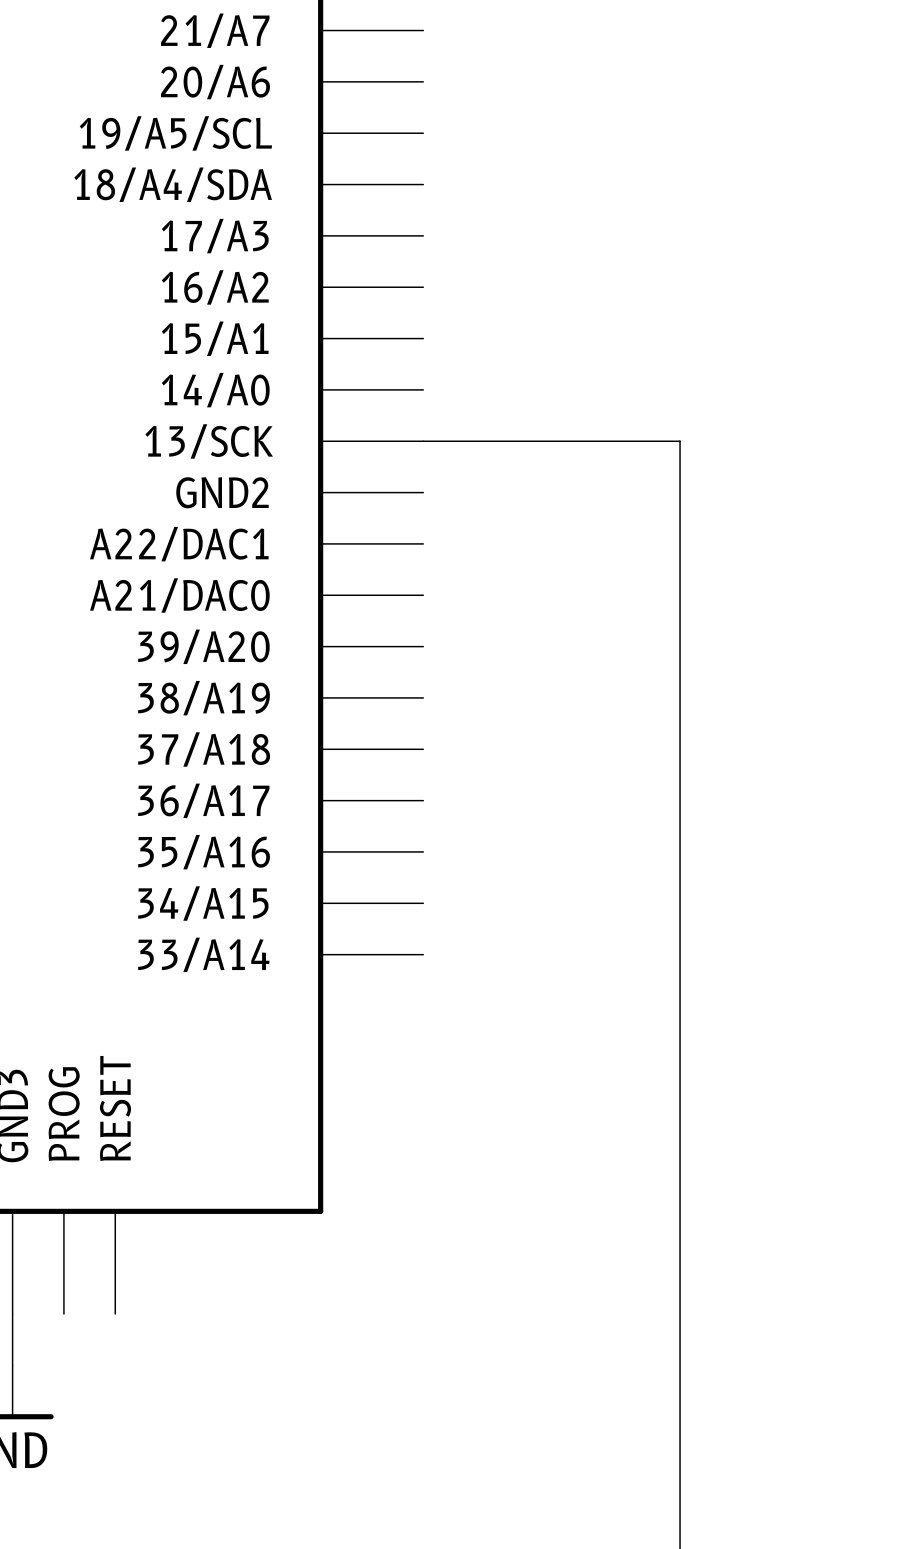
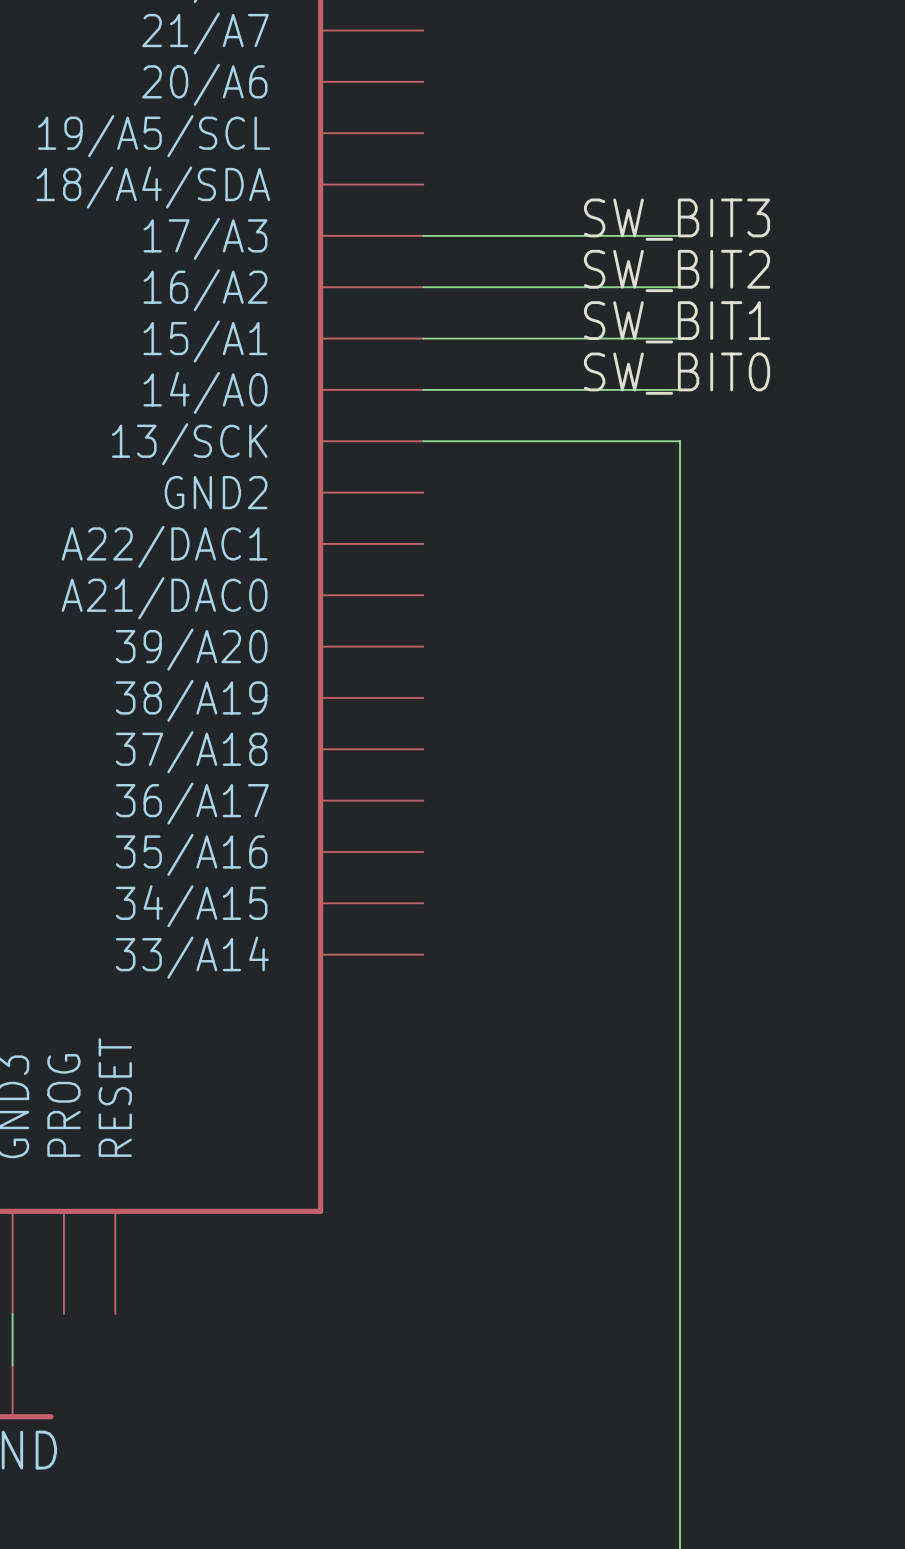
label: none -> SW_BIT3 (677, 219)
wire: none -> (423, 235) (680, 235)
label: none -> SW_BIT2 (677, 270)
wire: none -> (423, 287) (680, 287)
label: none -> SW_BIT1 (677, 322)
wire: none -> (423, 338) (680, 338)
label: none -> SW_BIT0 (677, 373)
wire: none -> (423, 389) (680, 389)

